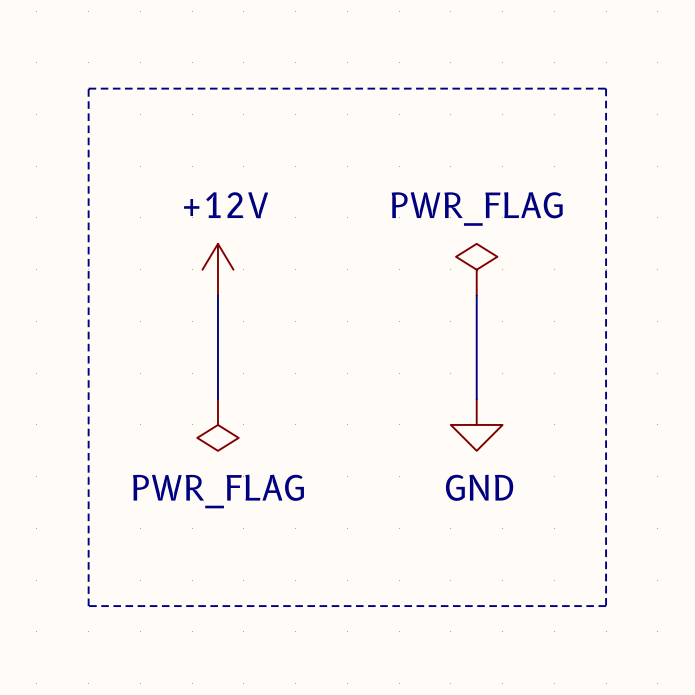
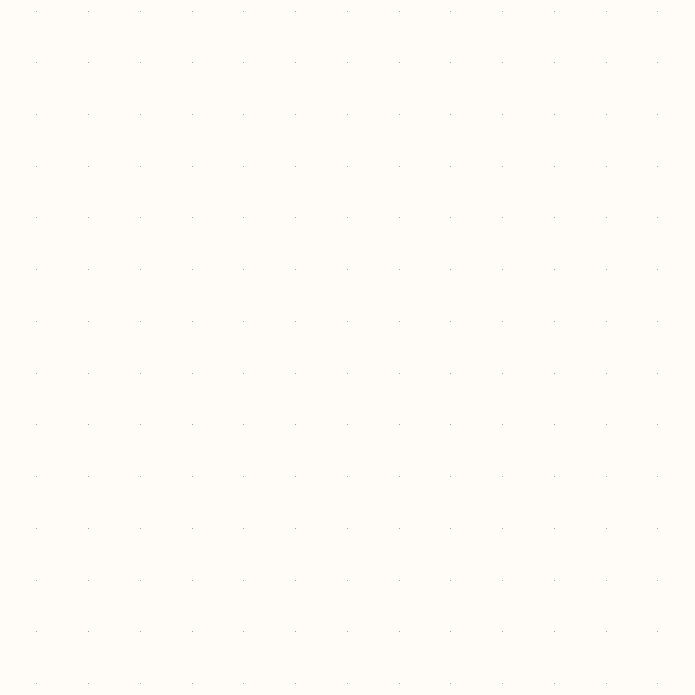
line: (88, 88) (606, 88) (606, 606) (88, 606) (88, 88) -> none
power symbol: +12V (217, 269) -> none
power symbol: PWR_FLAG (476, 269) -> none
wire: (217, 295) (217, 399) -> none
wire: (476, 295) (476, 399) -> none
power symbol: PWR_FLAG (217, 424) -> none
power symbol: GND (476, 424) -> none

